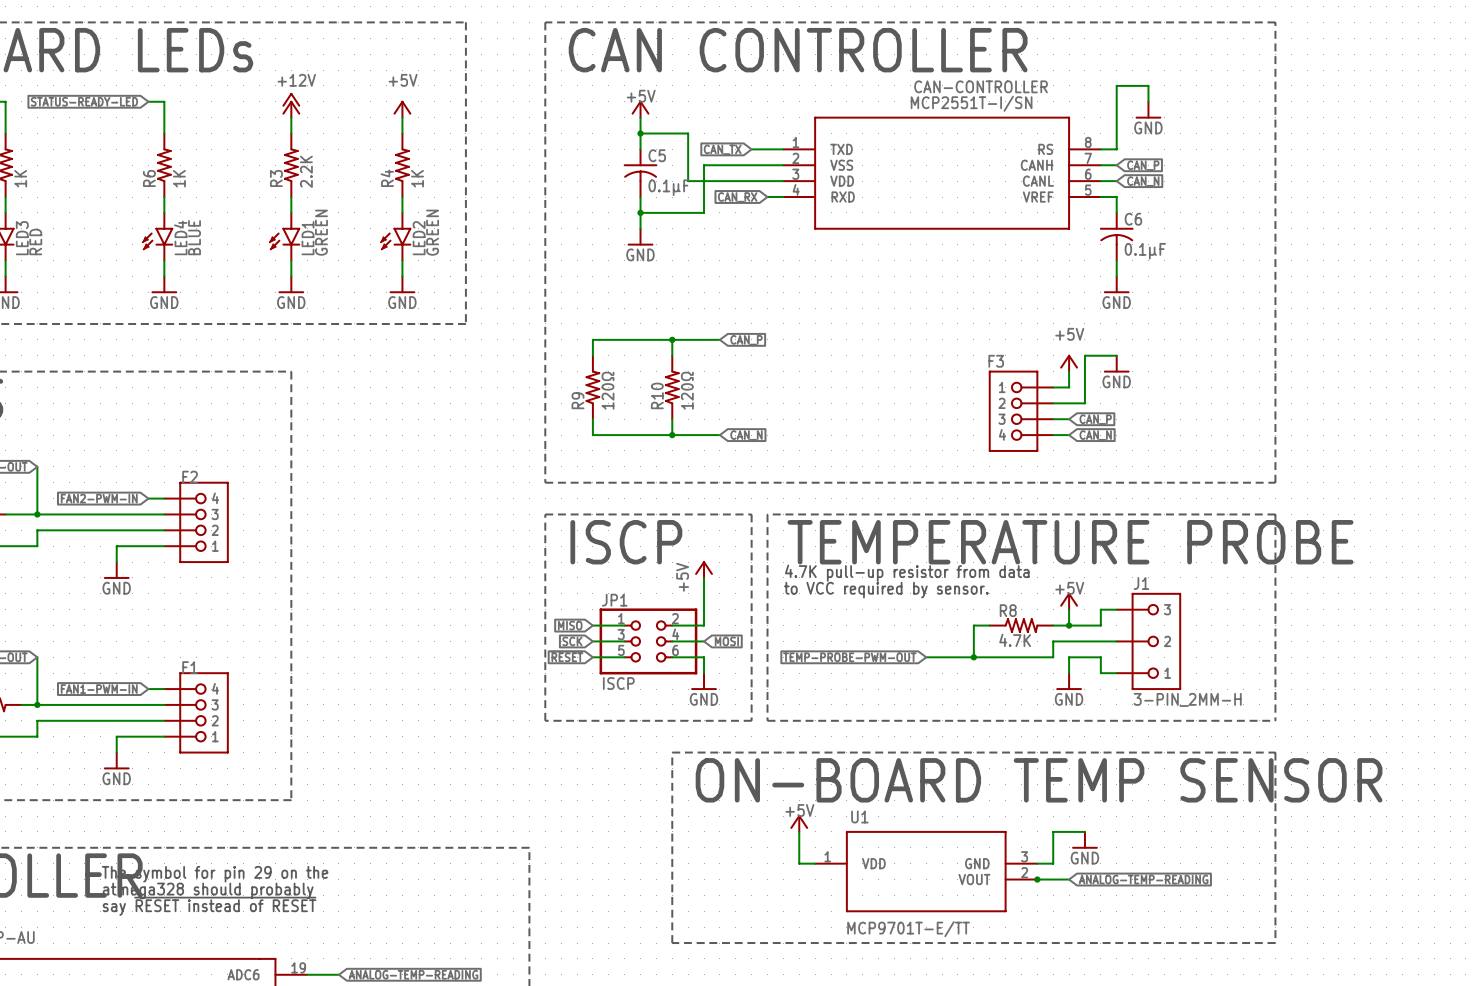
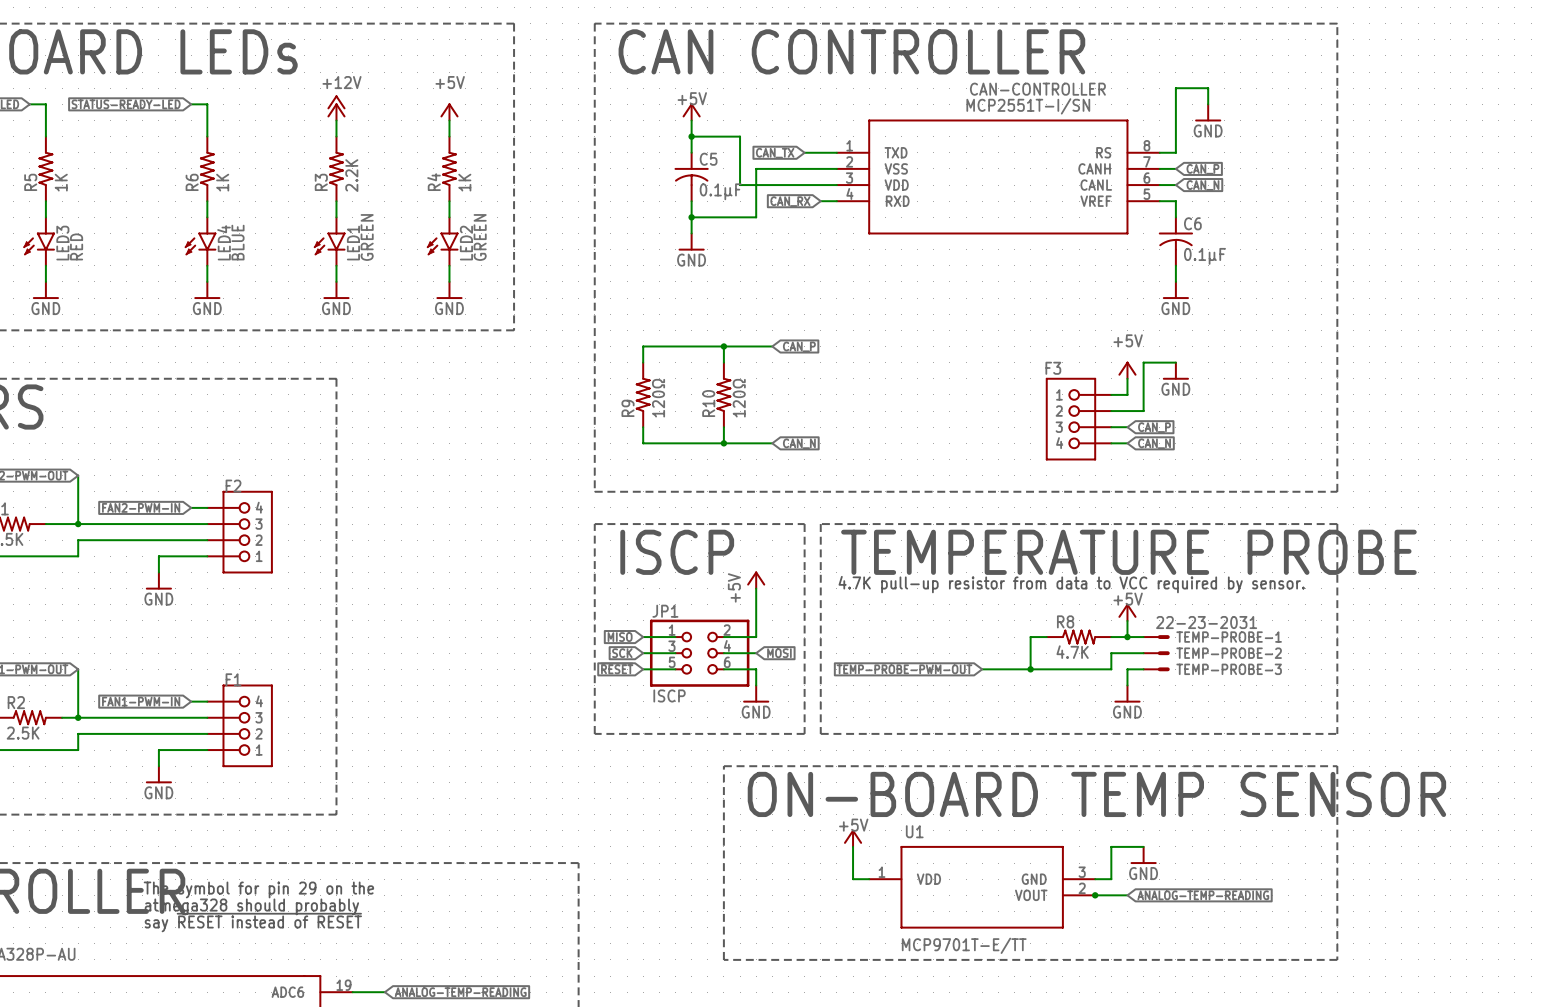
text: 4.7K pull-up resistor from data (907, 573) -> 4.7K pull-up resistor from data to VCC required by sensor. (1071, 584)
text: to VCC required by sensor. (886, 590) -> none
TEMP-PROBE-1: none -> 22-23-2031 (1156, 637)
TEMP-PROBE-2: none -> (1156, 653)
J1: 3-PIN_2MM-H (1148, 641) -> none
wire: (1084, 657) (1100, 657) (1100, 673) (1116, 673) -> none
TEMP-PROBE-3: none -> (1156, 669)

